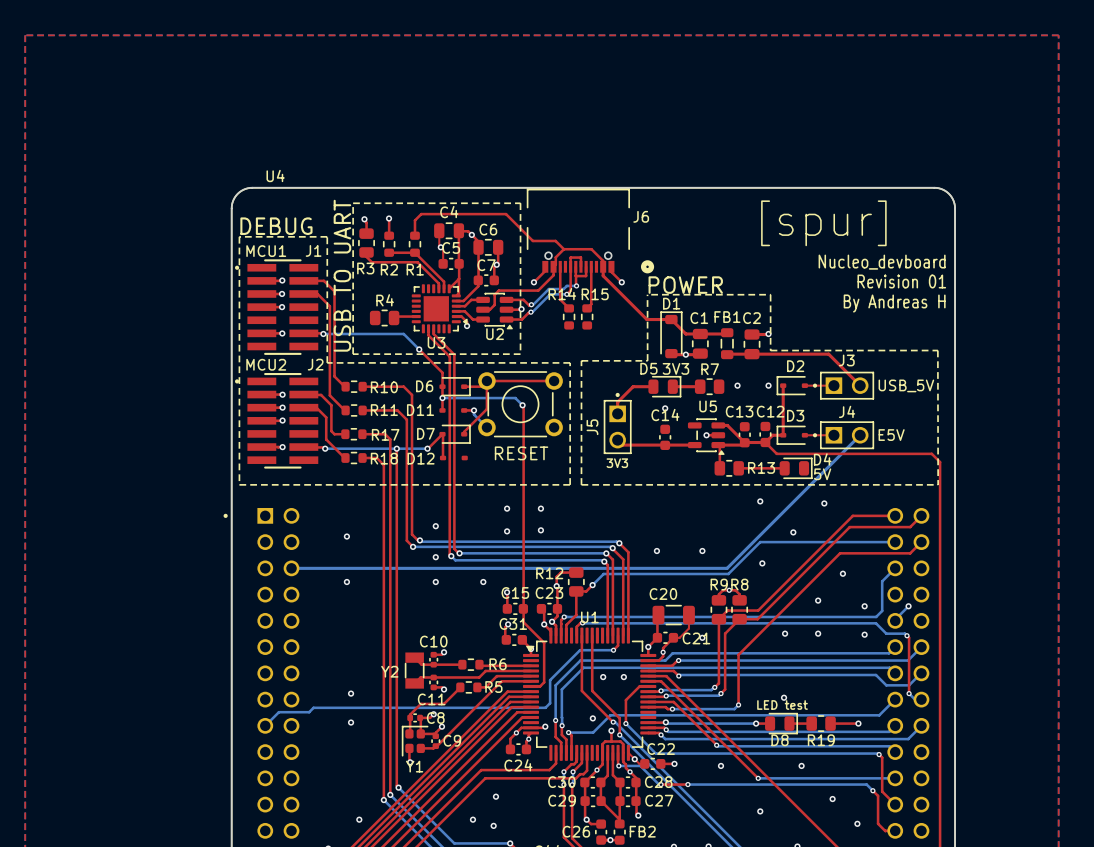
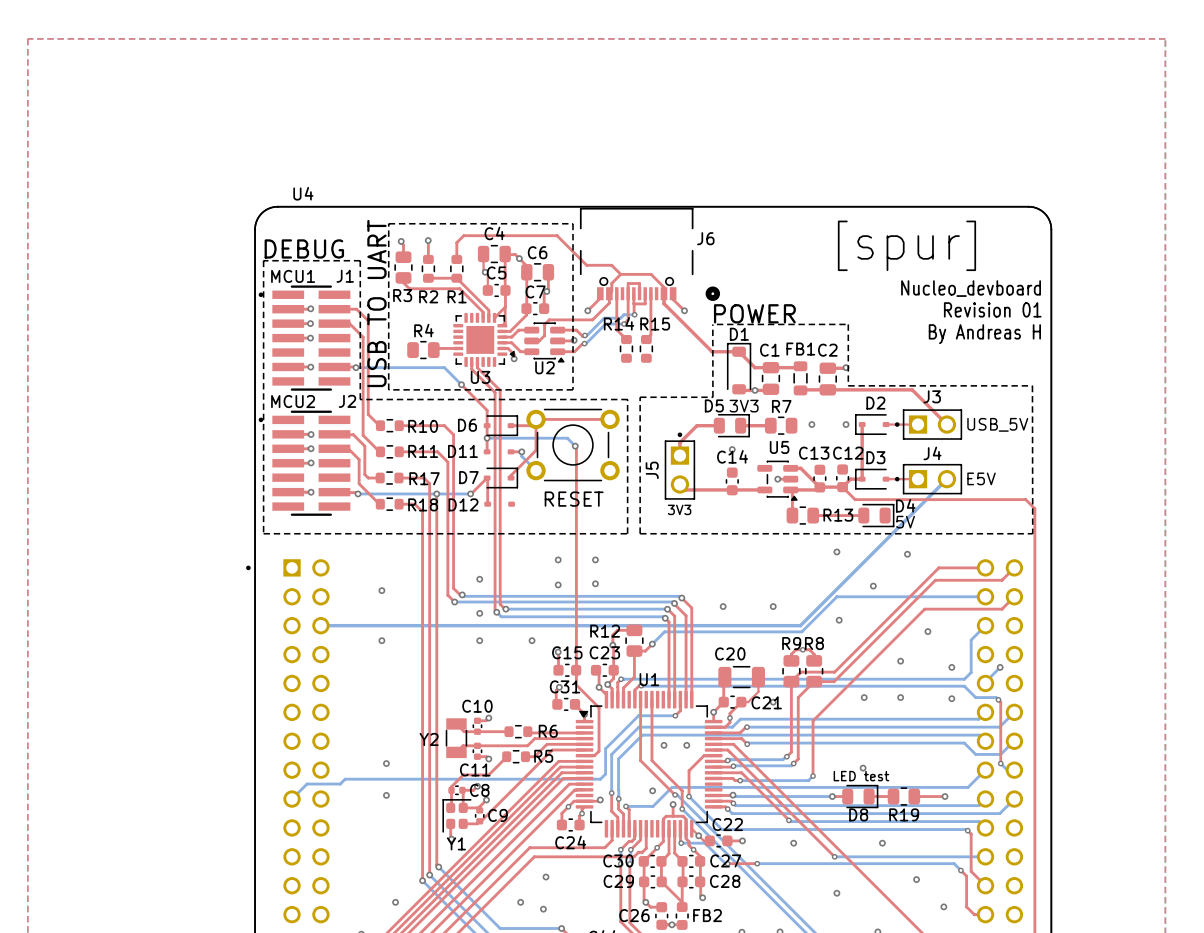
C28 name: C28 (658, 782) -> C27 (725, 860)
C27 name: C27 (659, 800) -> C28 (725, 881)

